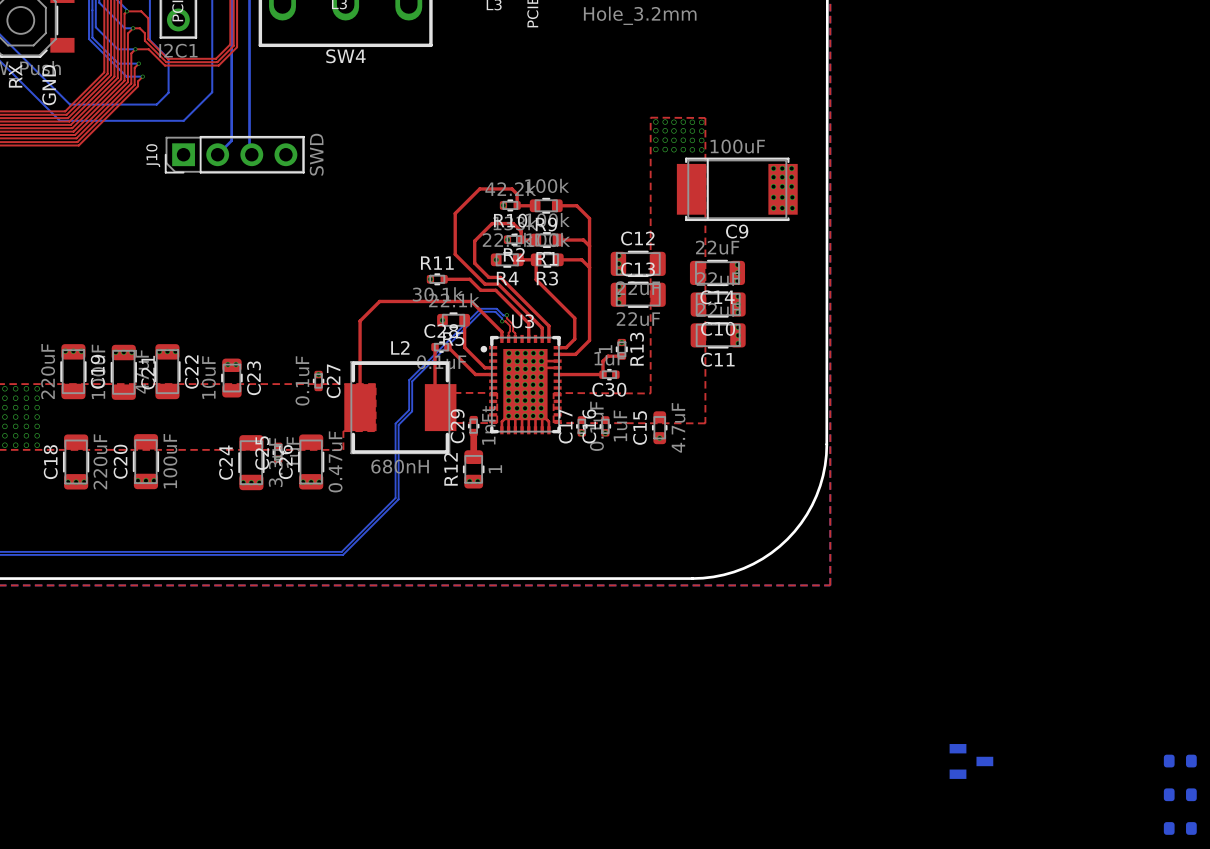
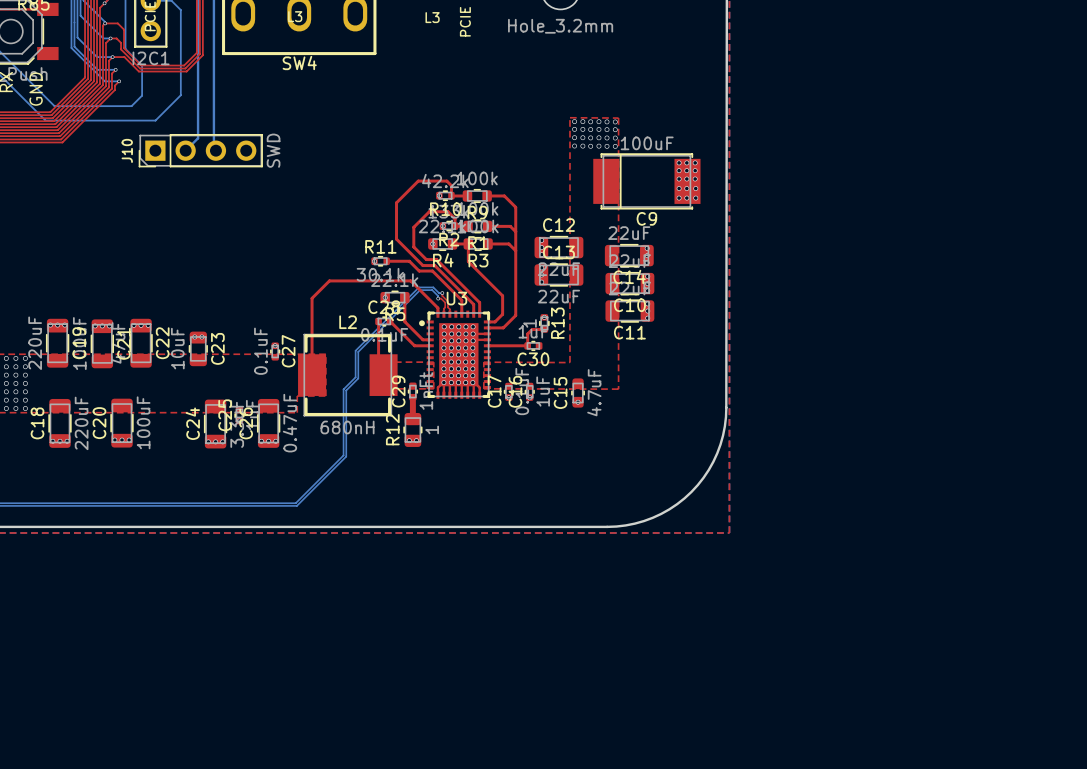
part: (971, 761) -> none
part: (1180, 761) -> none
part: (1180, 794) -> none
part: (1180, 828) -> none

